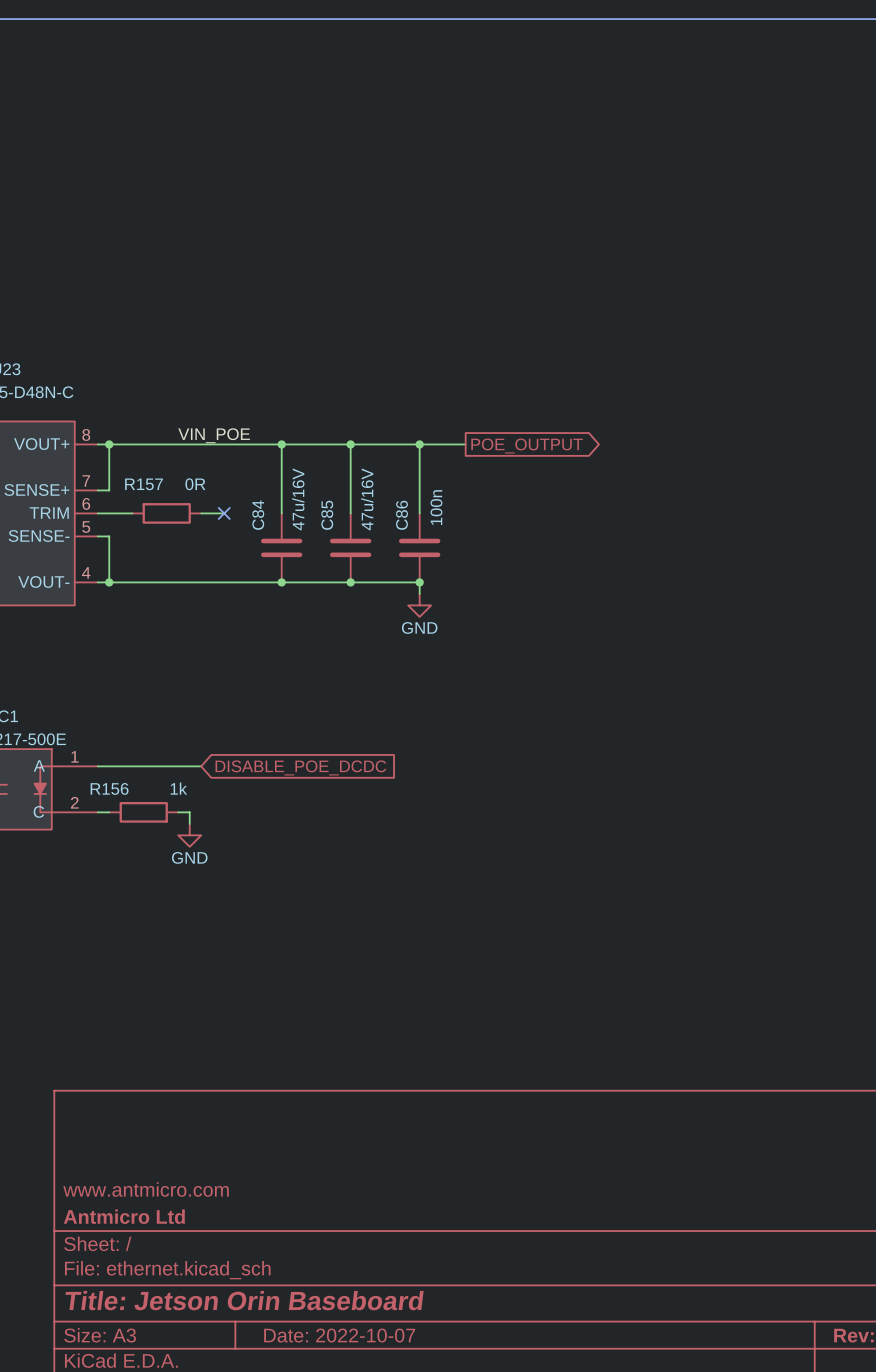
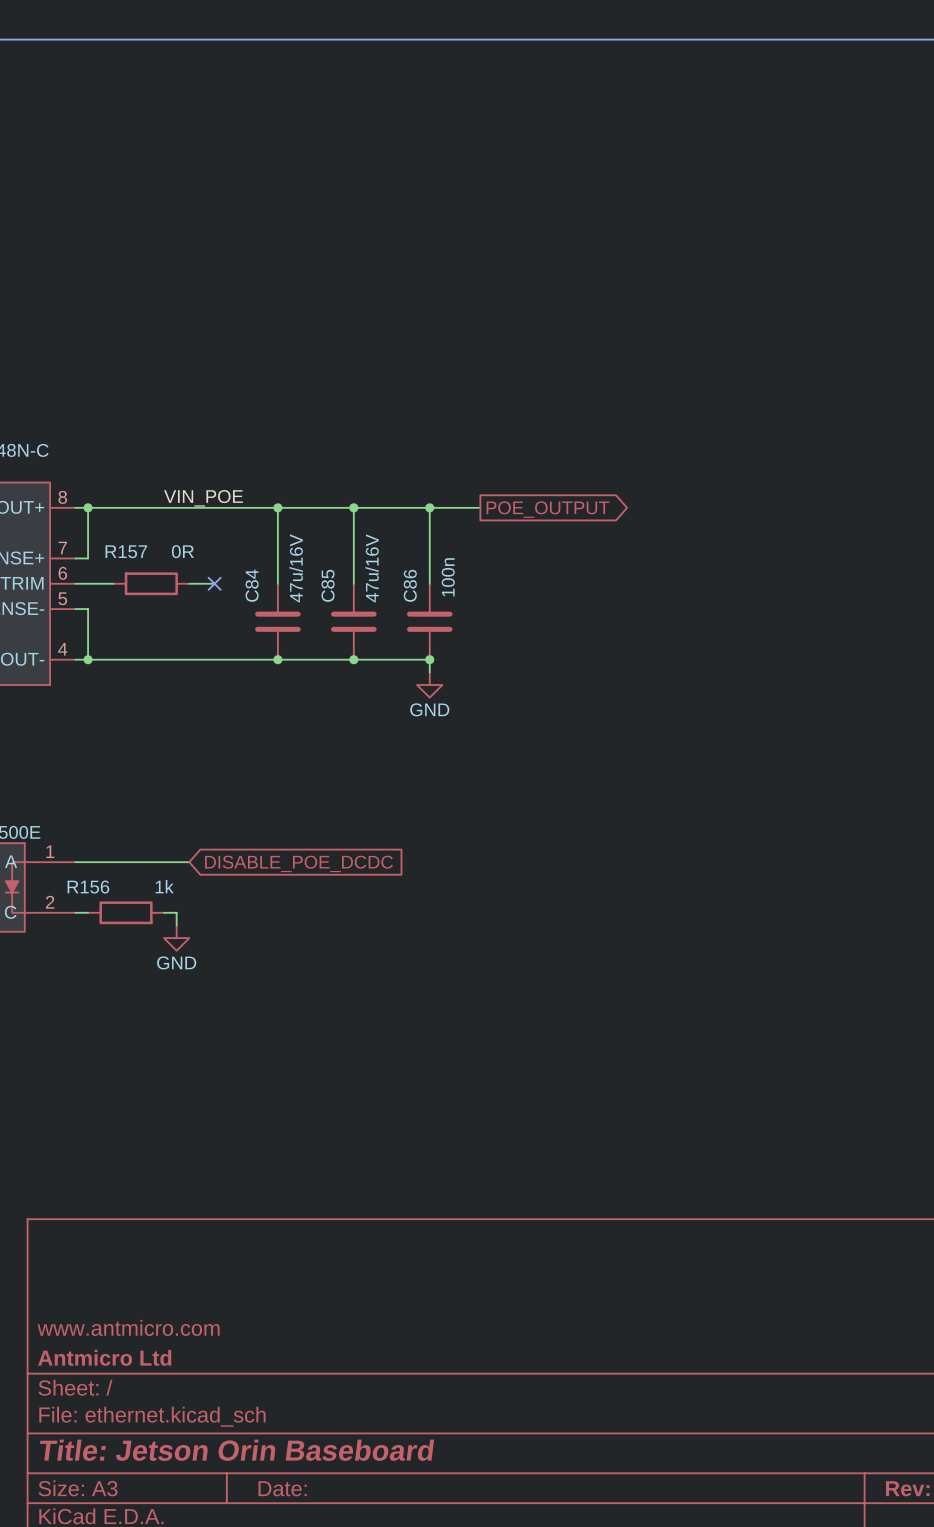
title block: Date: 2022-10-07 (339, 1335) -> Date: (282, 1488)

